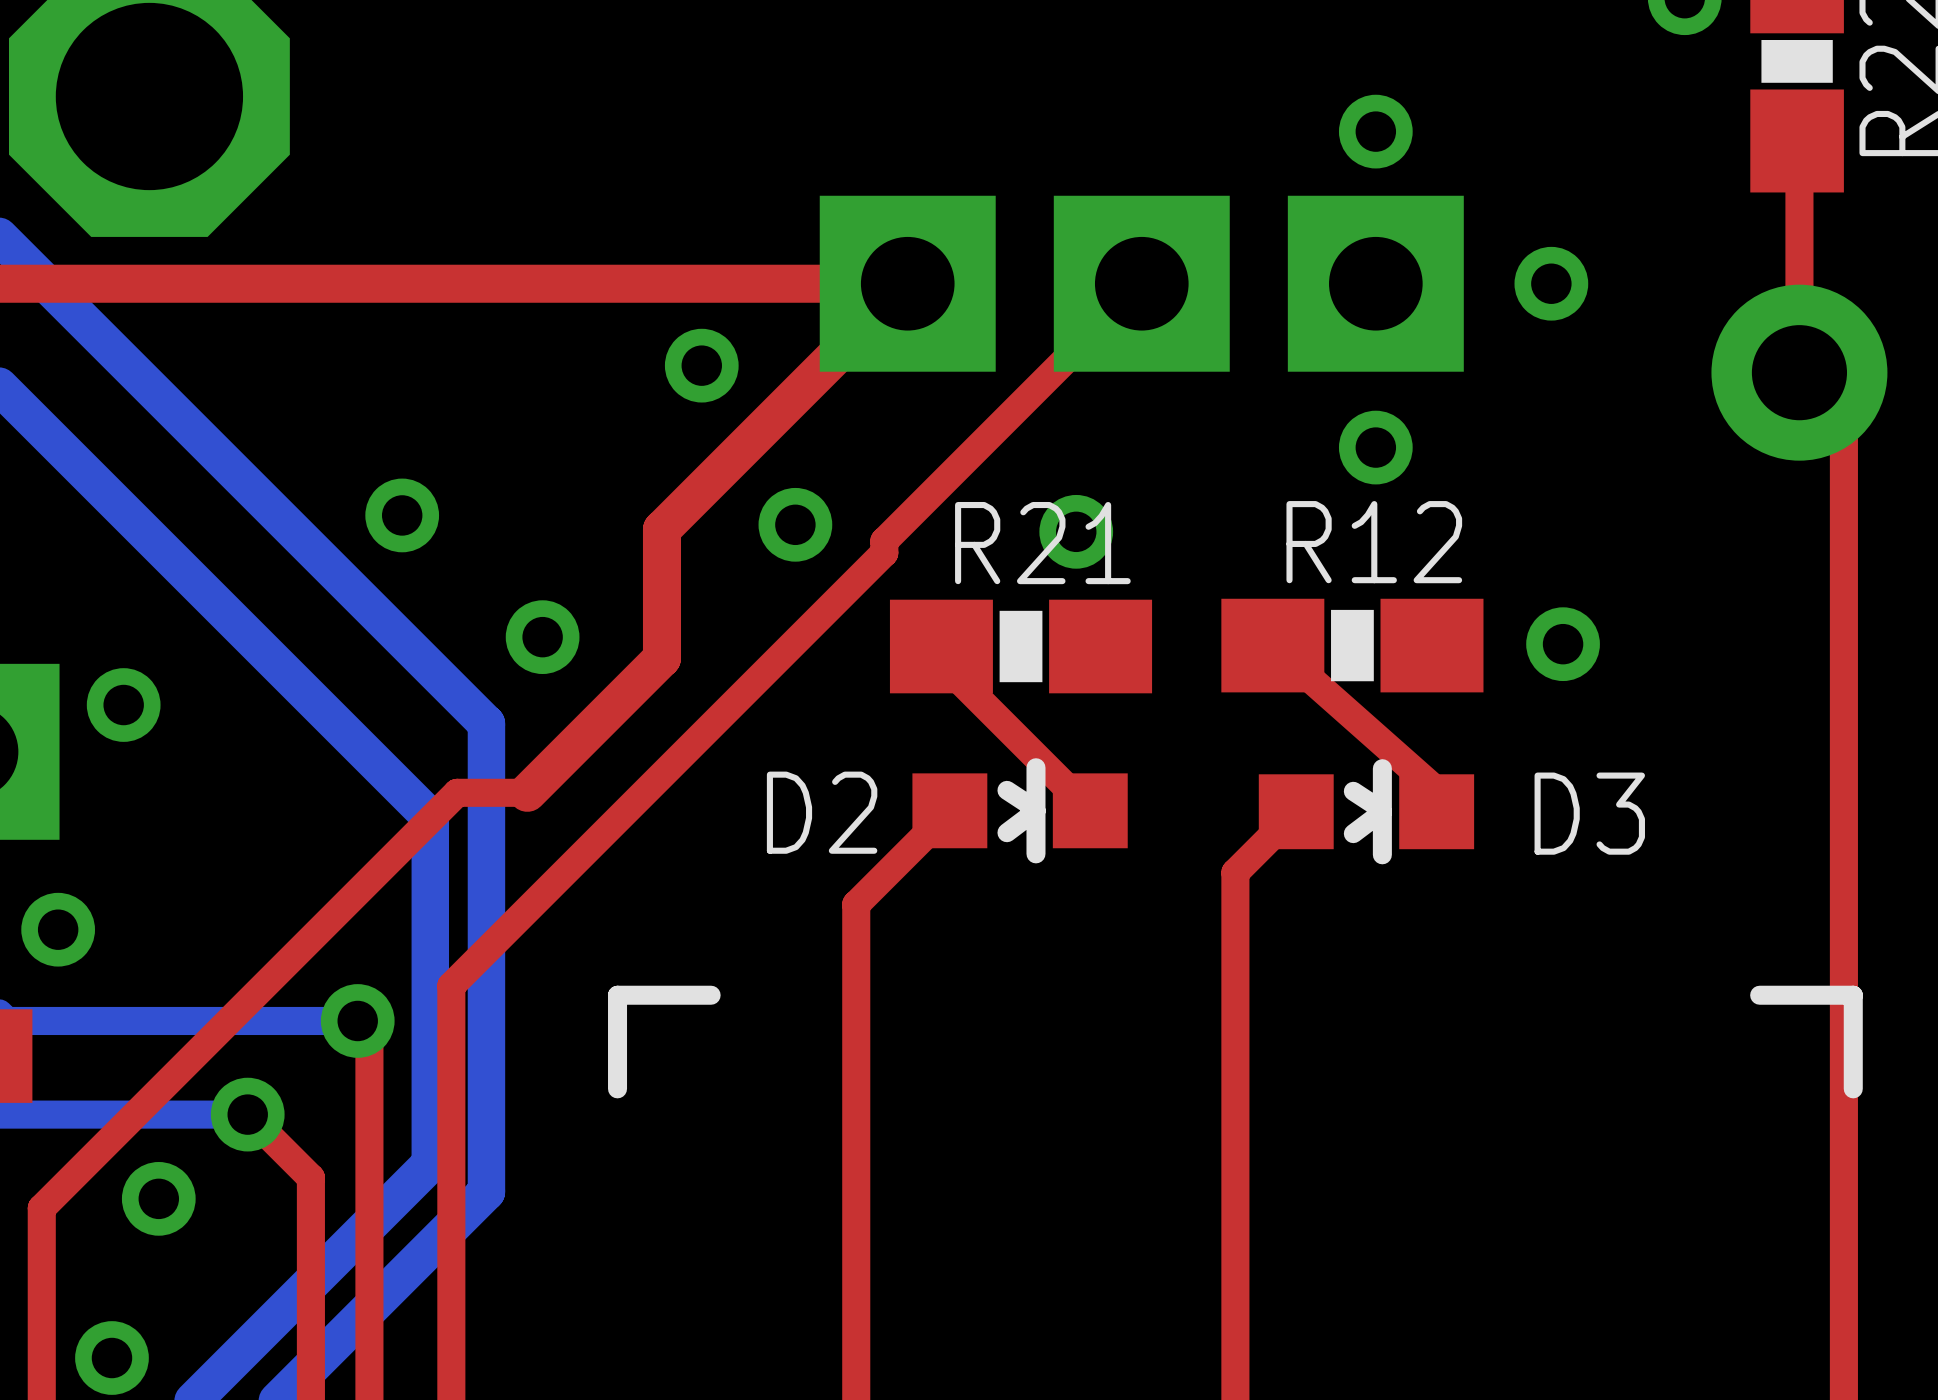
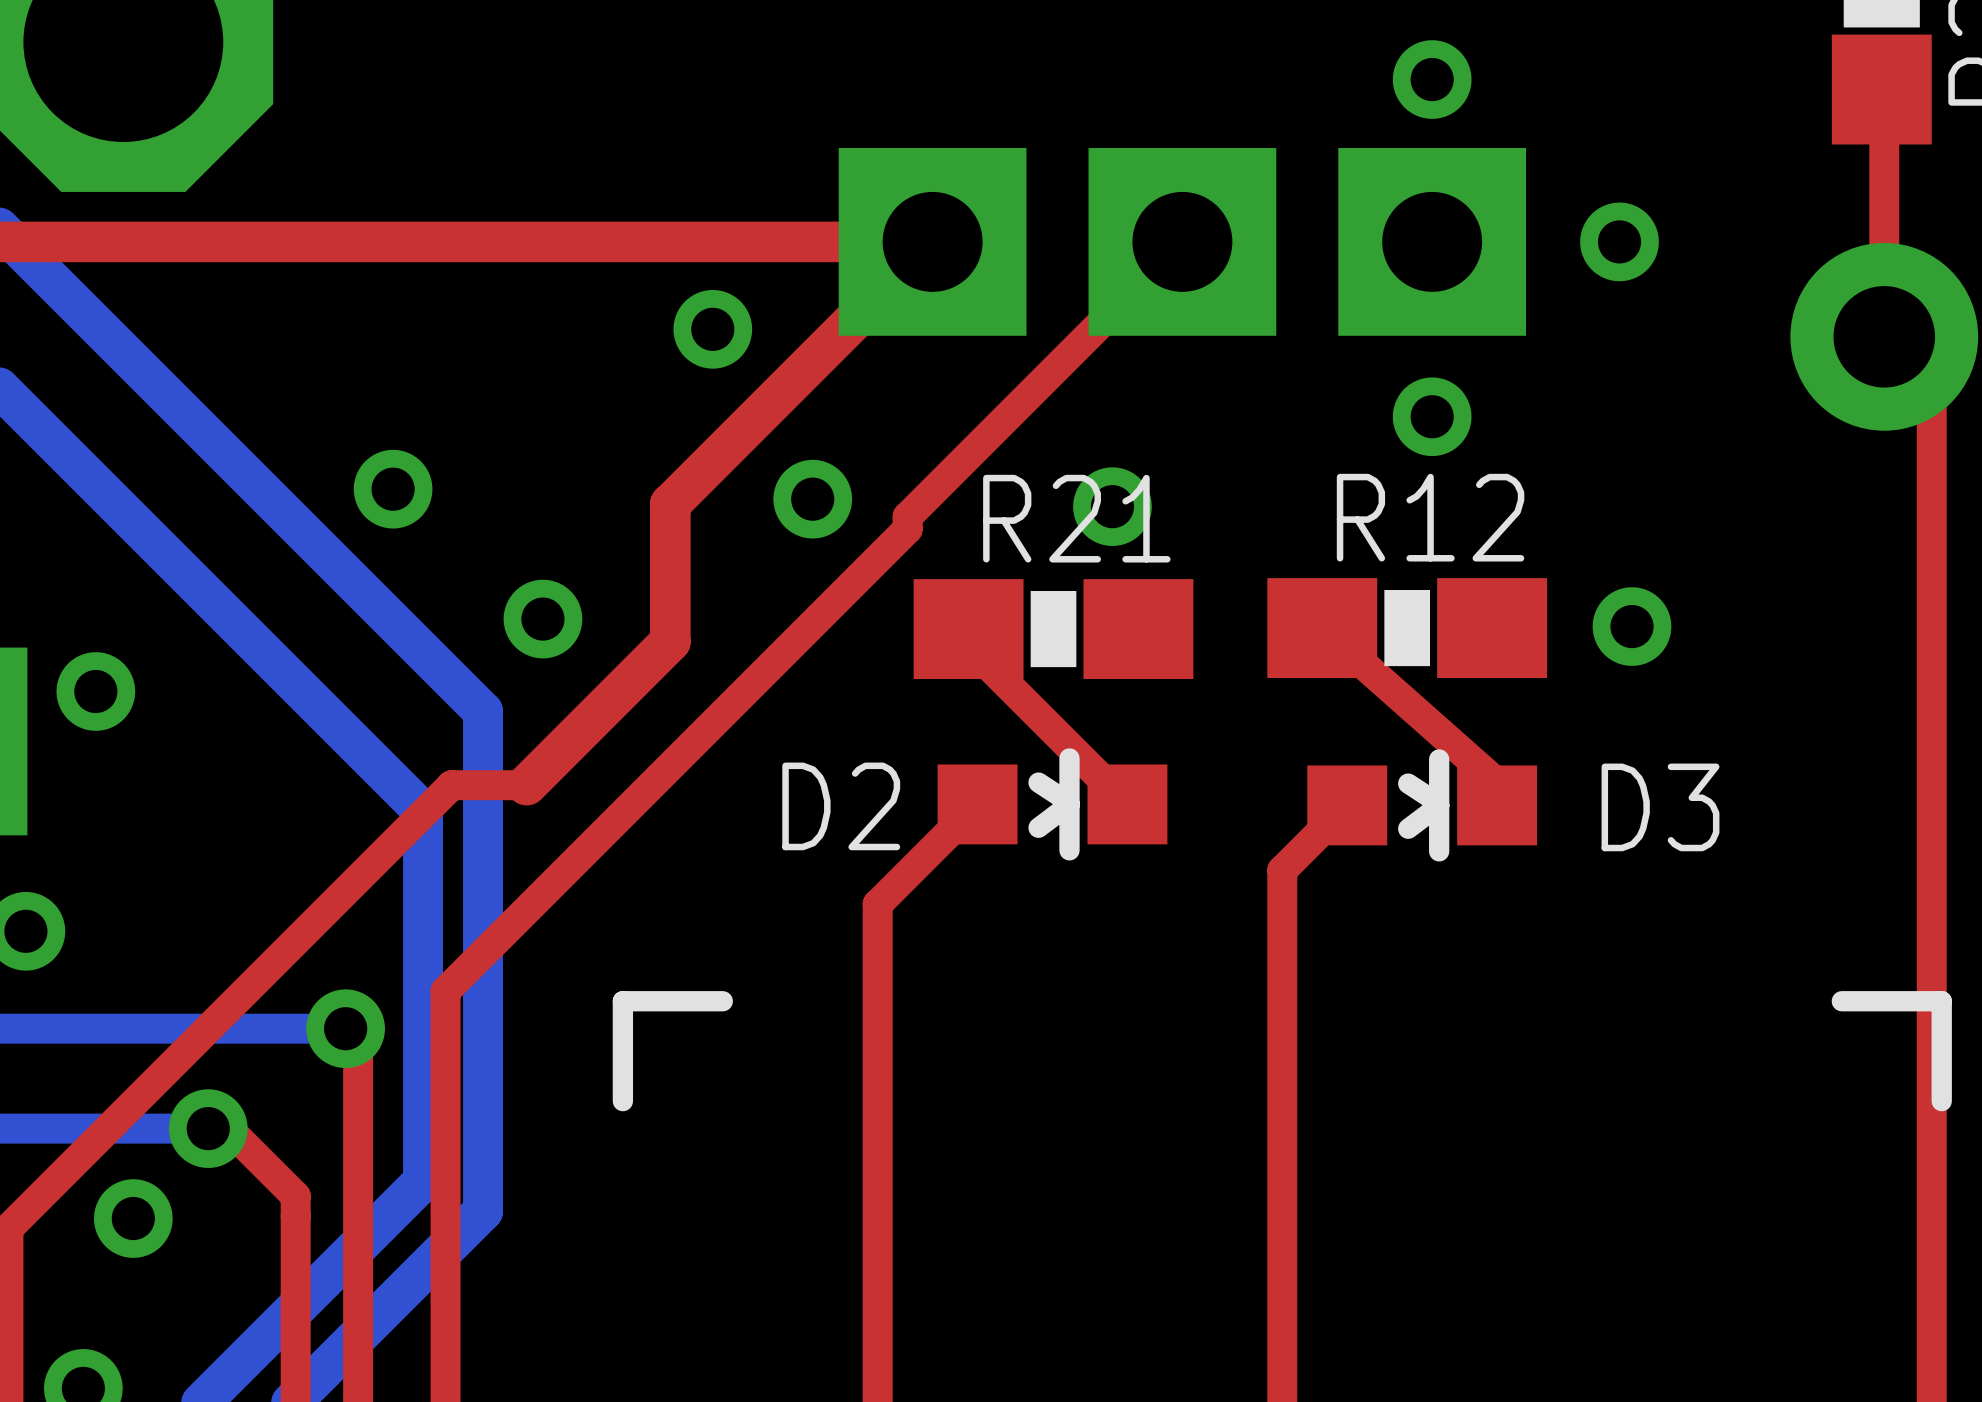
via position: (247, 1114) -> (208, 1128)

